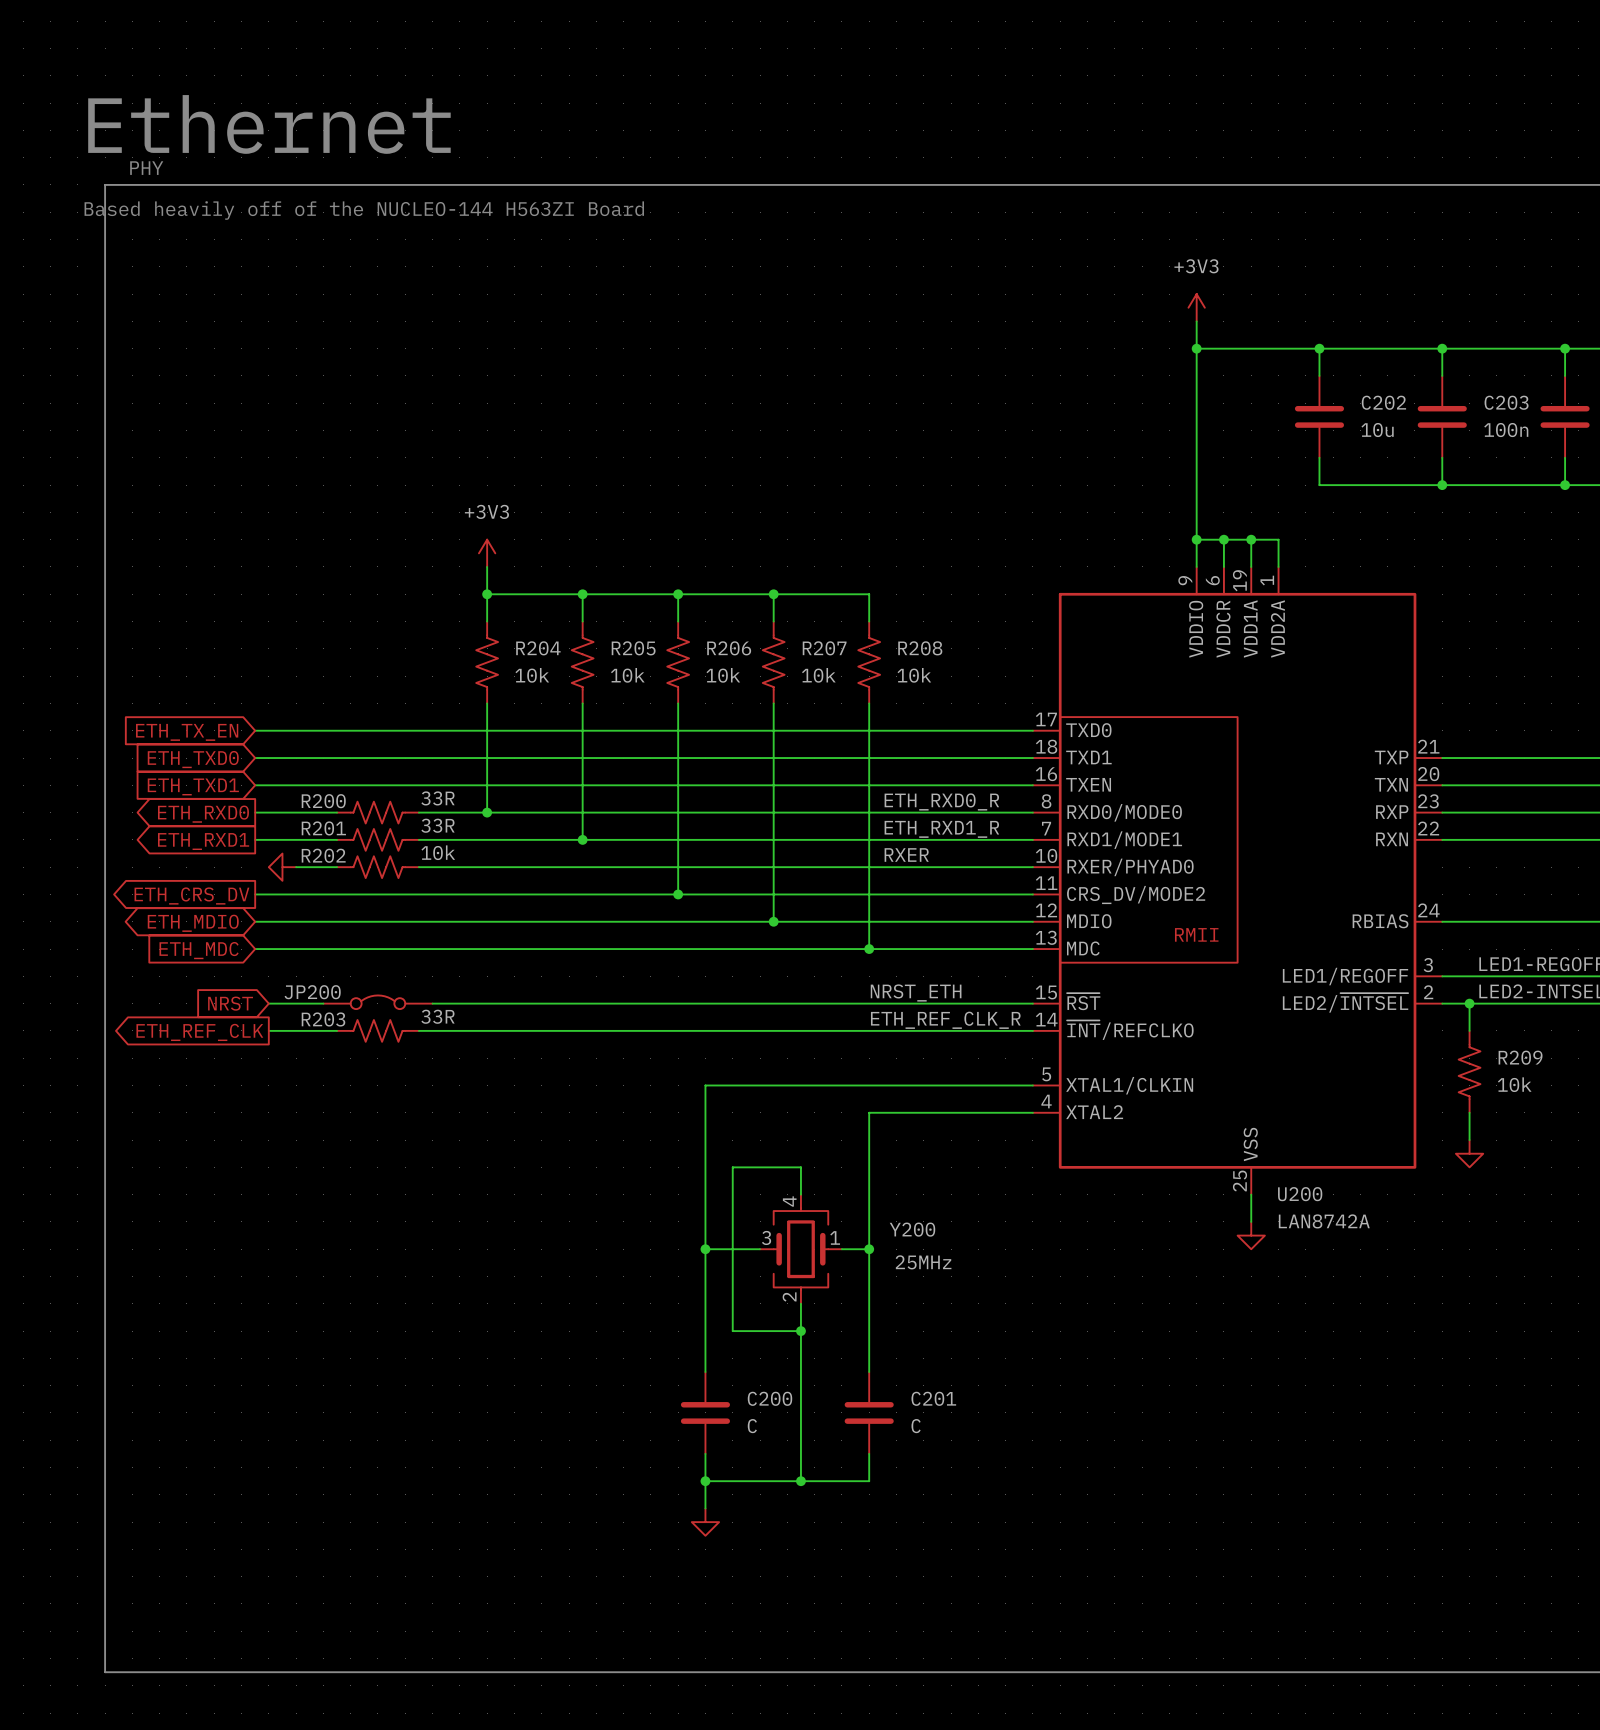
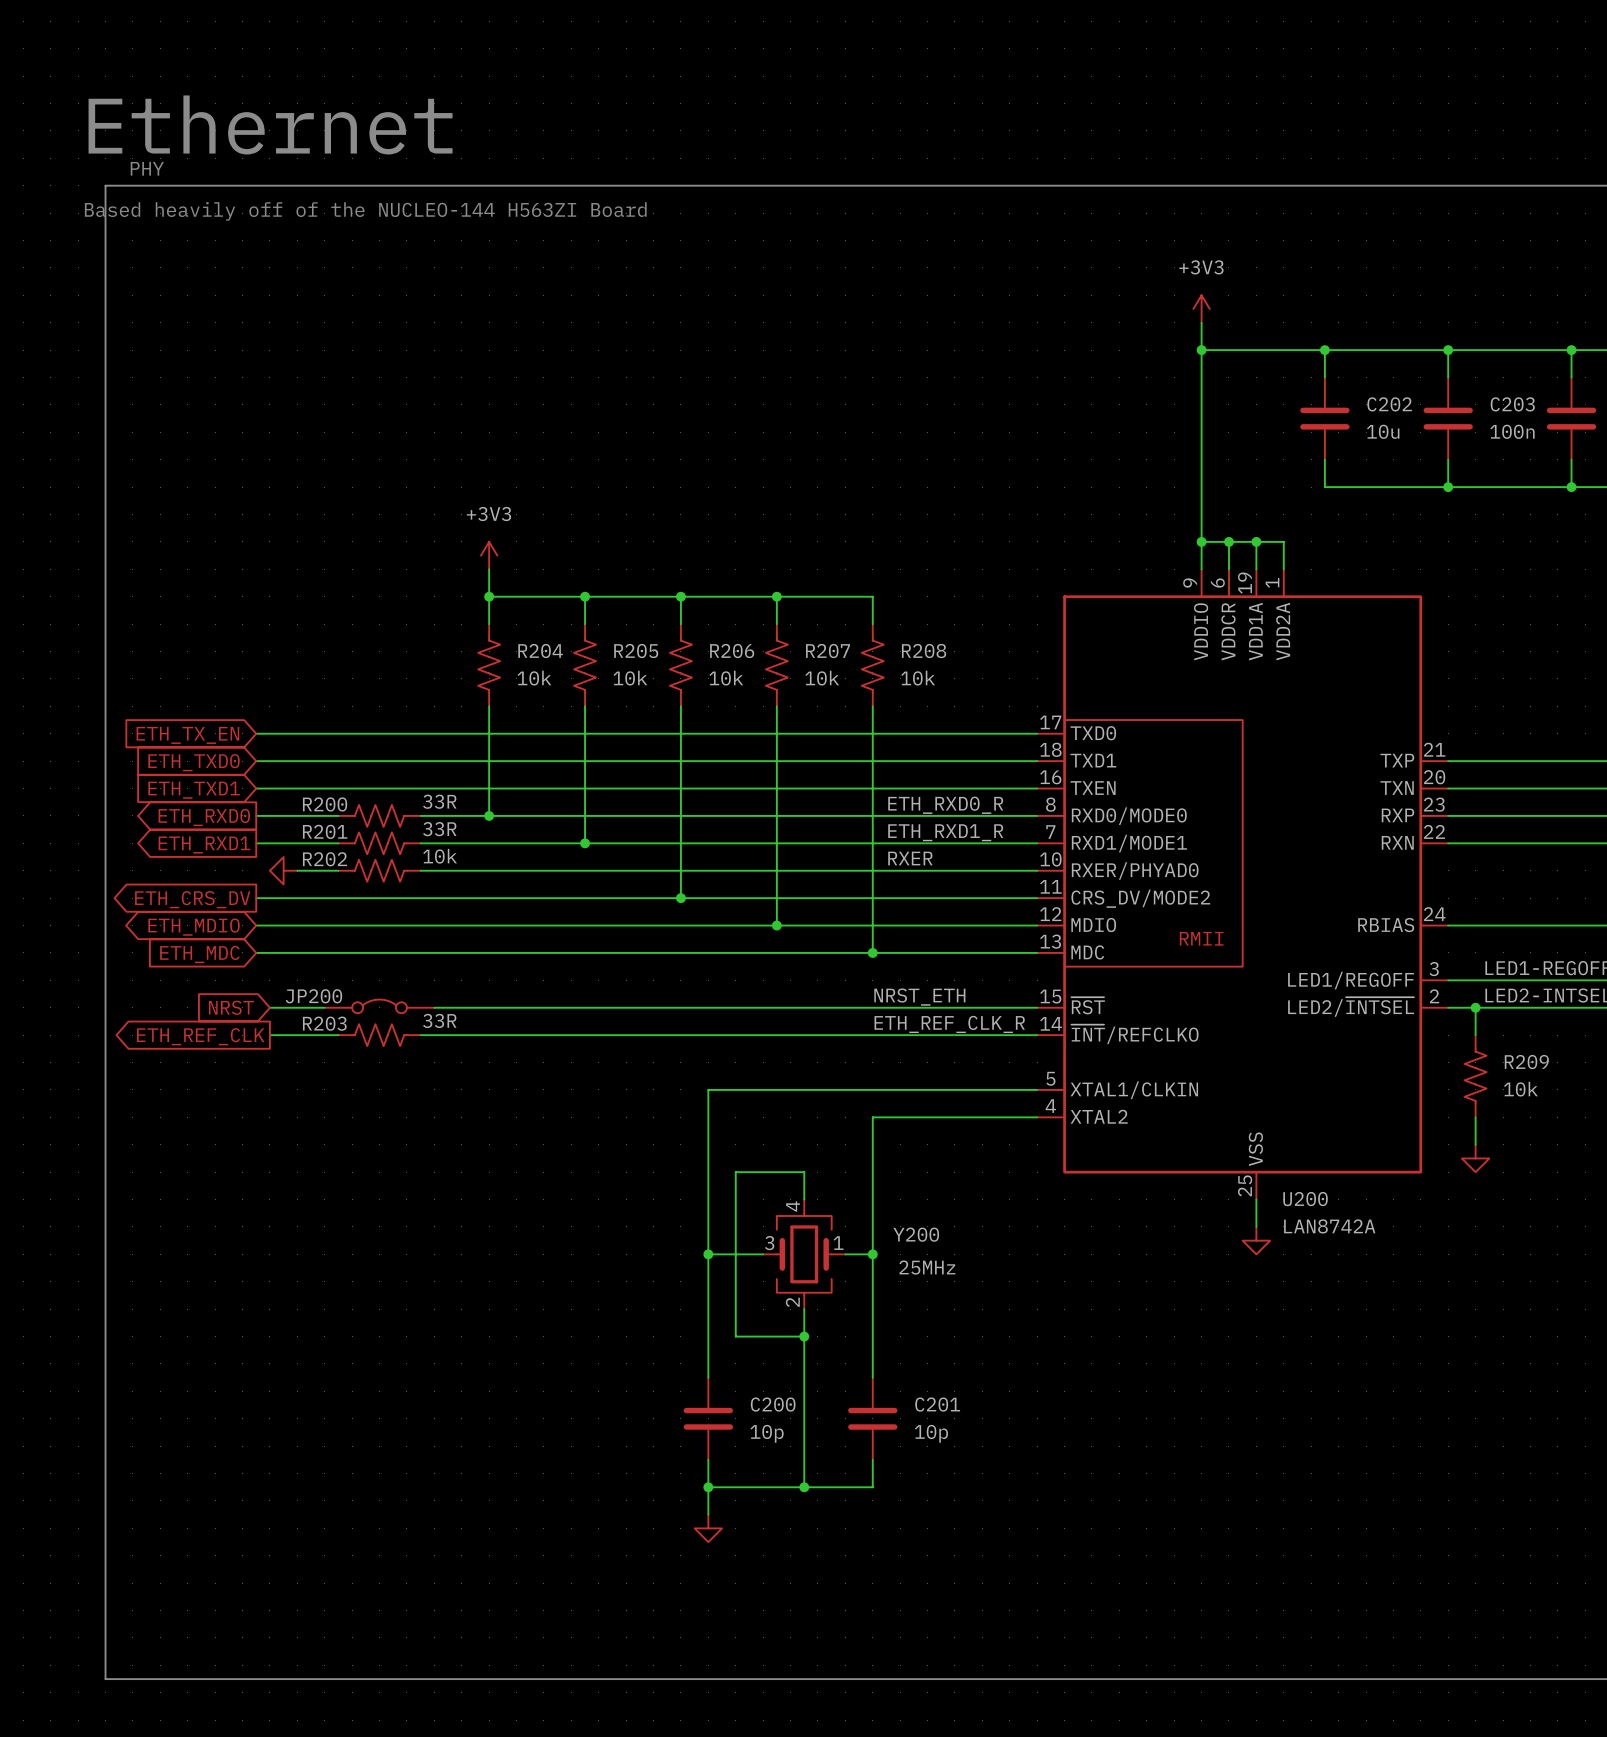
C200 value: C (752, 1426) -> 10p (767, 1433)
C201 value: C (916, 1426) -> 10p (931, 1433)

